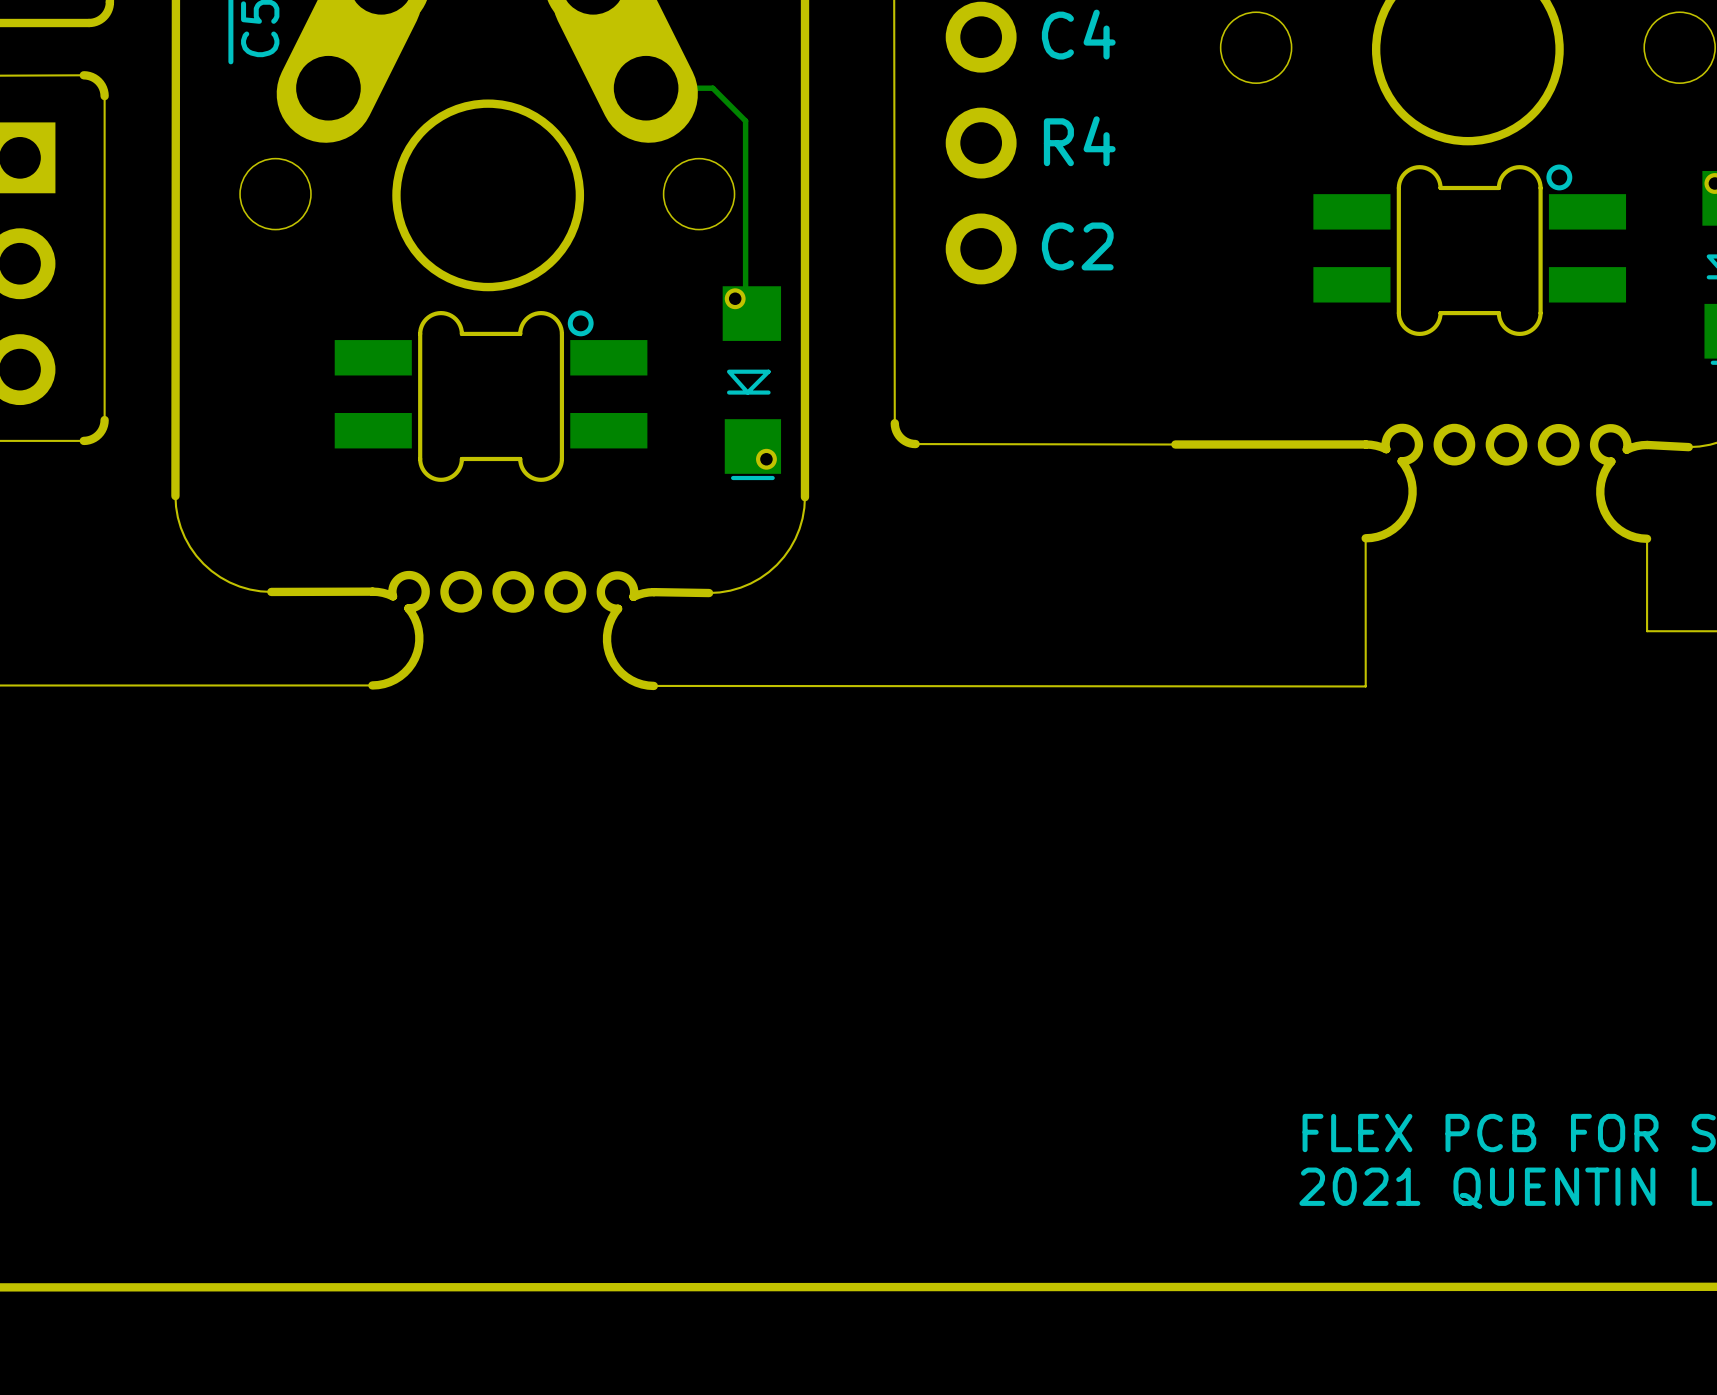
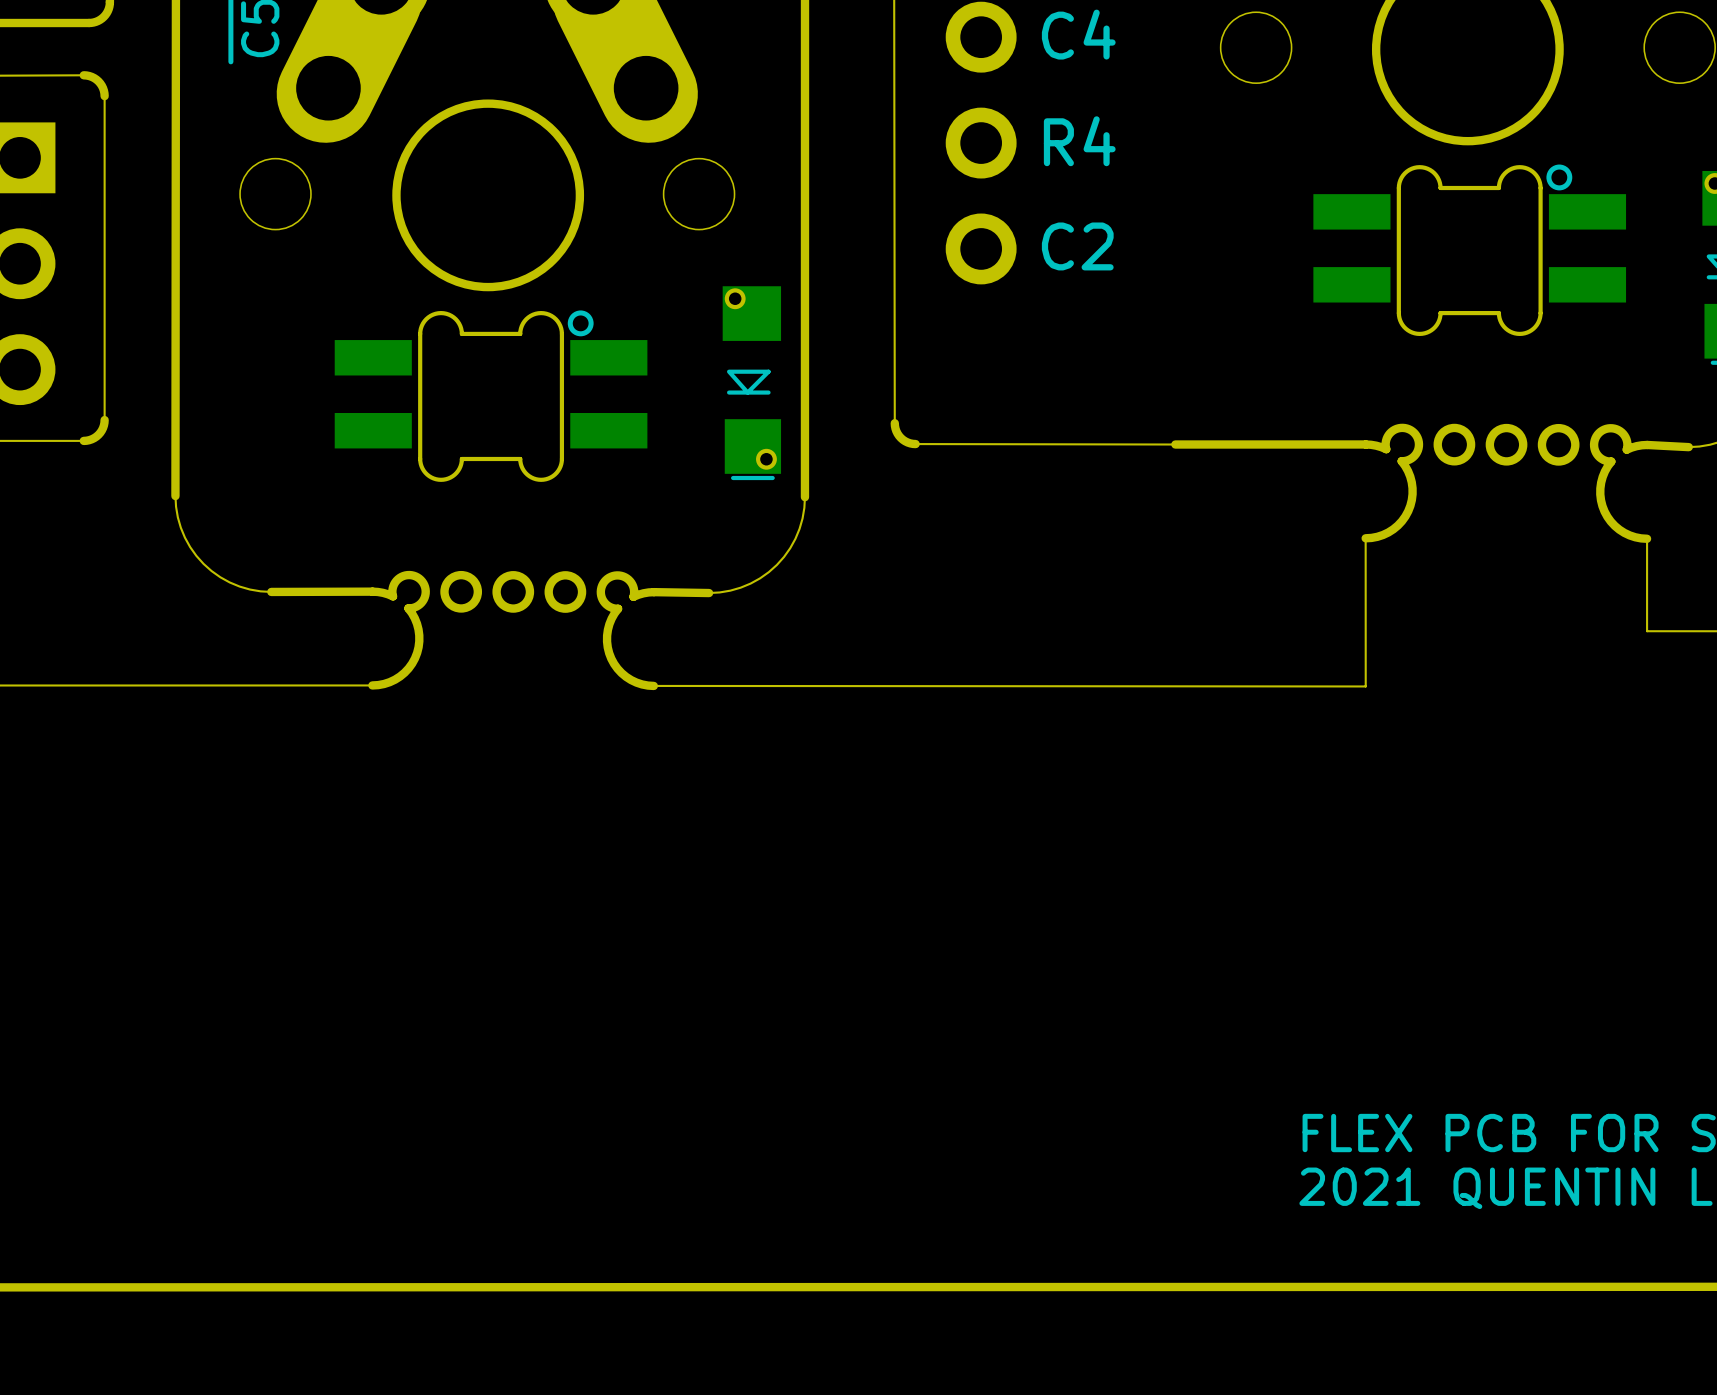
track: (646, 88) (712, 88) (745, 120) (745, 288) (735, 298) -> none

